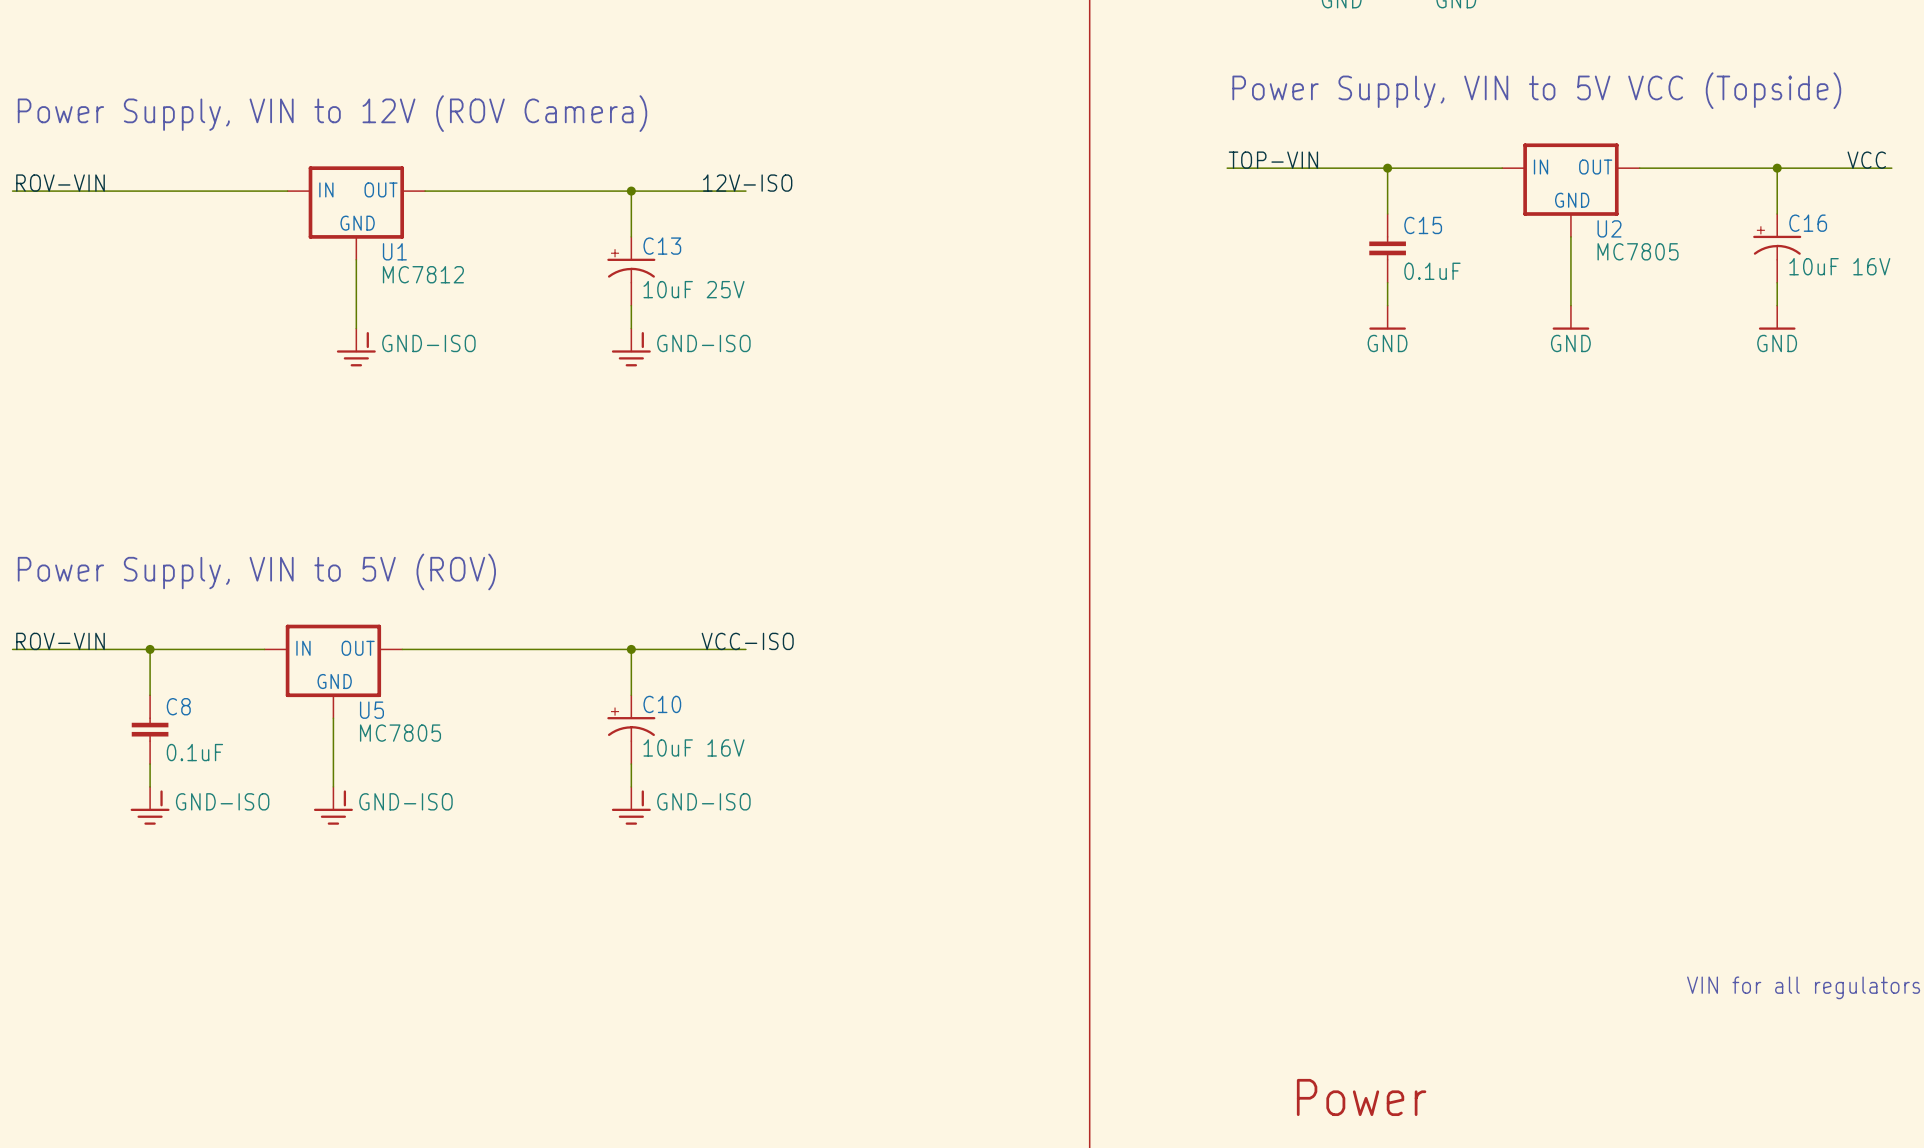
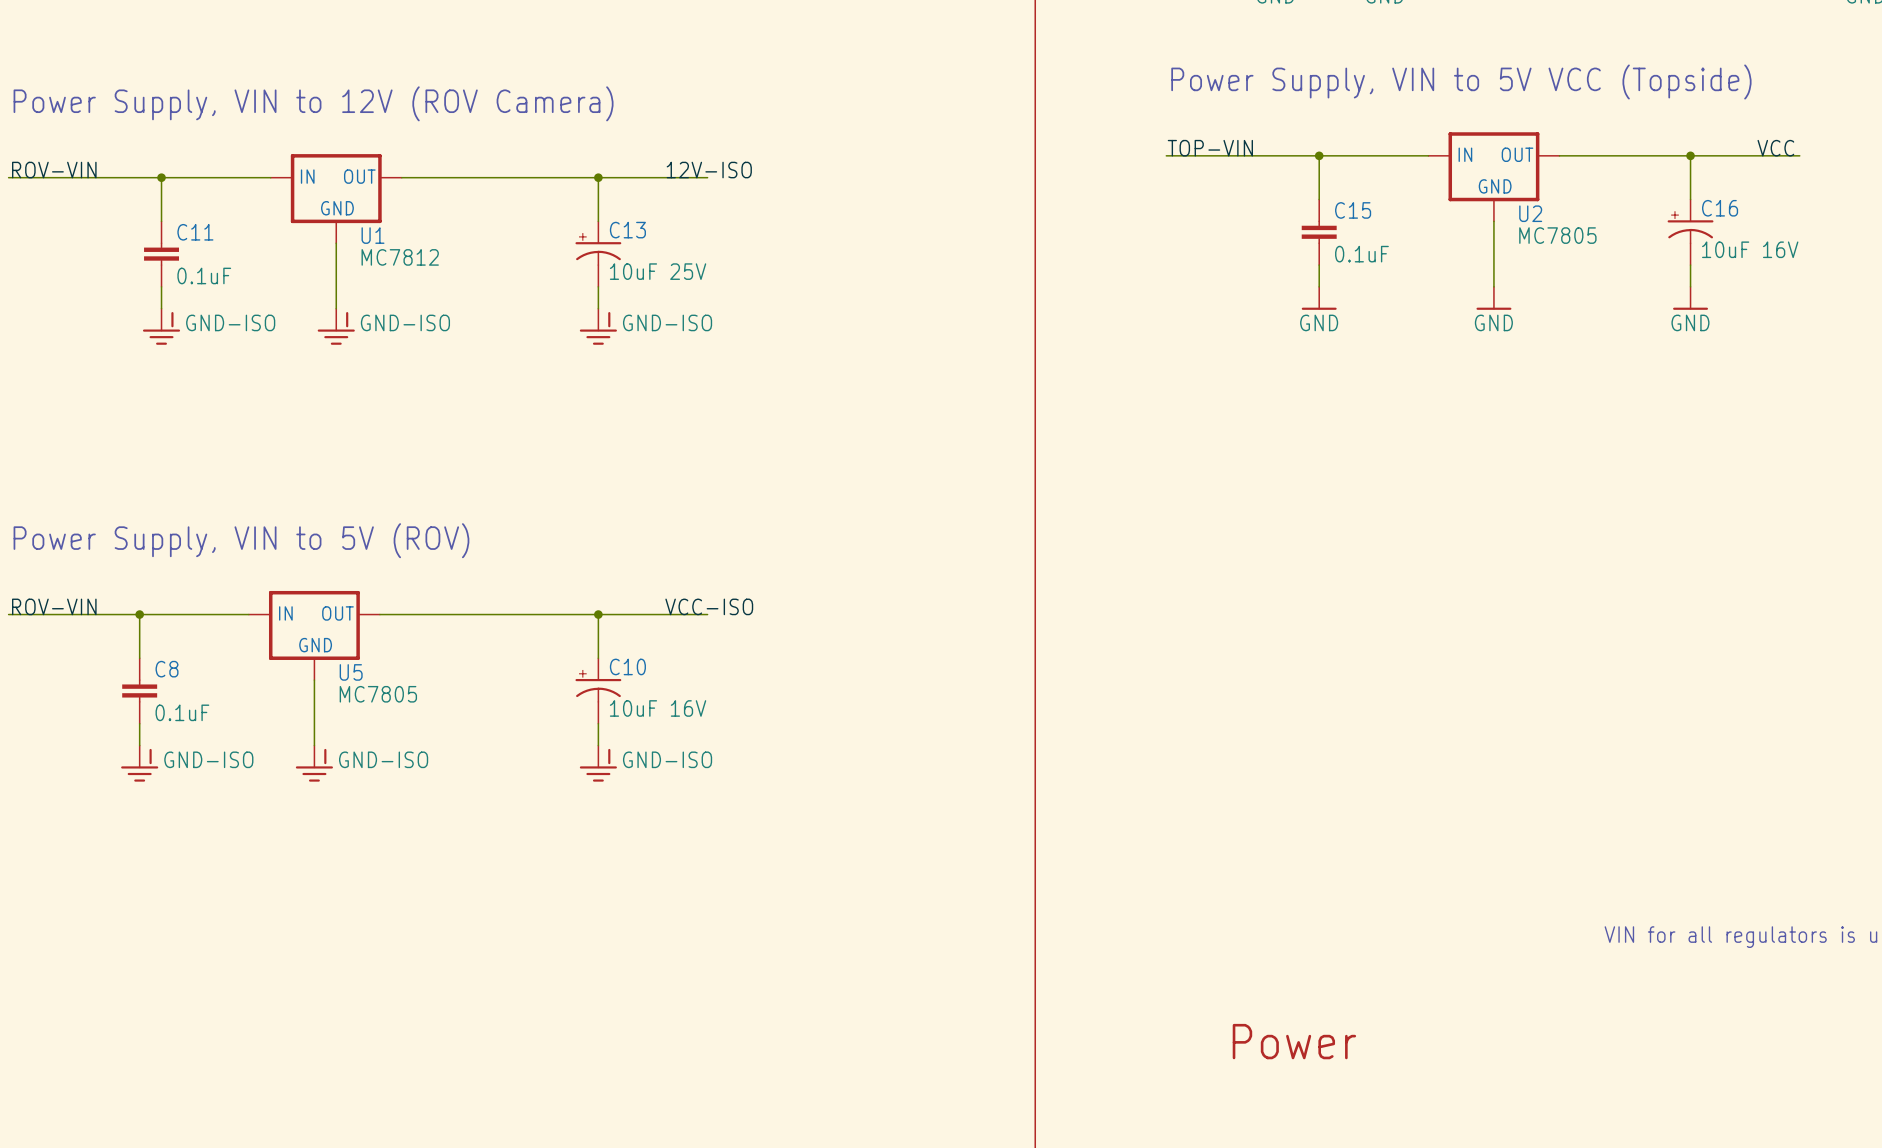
wire: none -> (161, 177) (161, 221)
junction: none -> (161, 177)
C11: none -> 0.1uF (161, 254)
wire: none -> (161, 286) (161, 308)
power symbol: none -> GND-ISO (161, 326)

